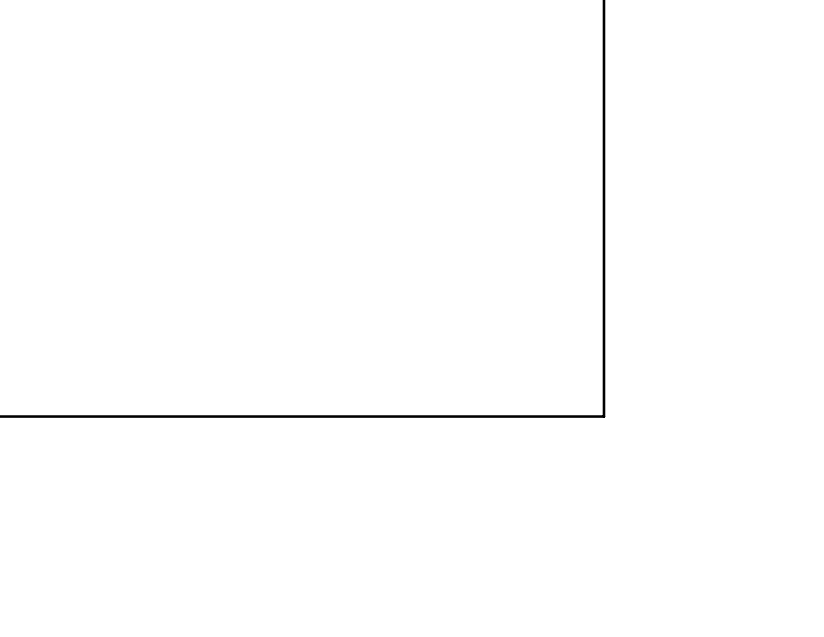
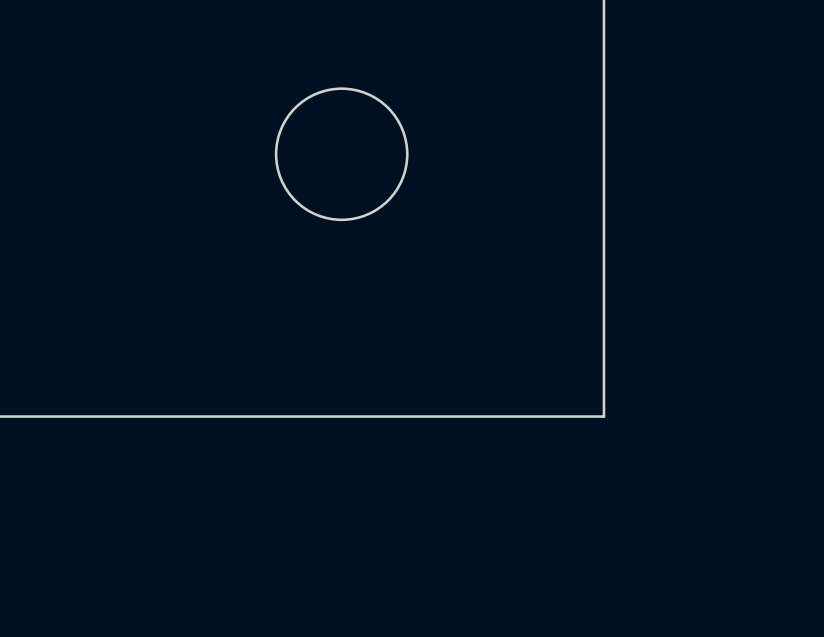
round board edge: none -> [274, 87, 409, 222]

